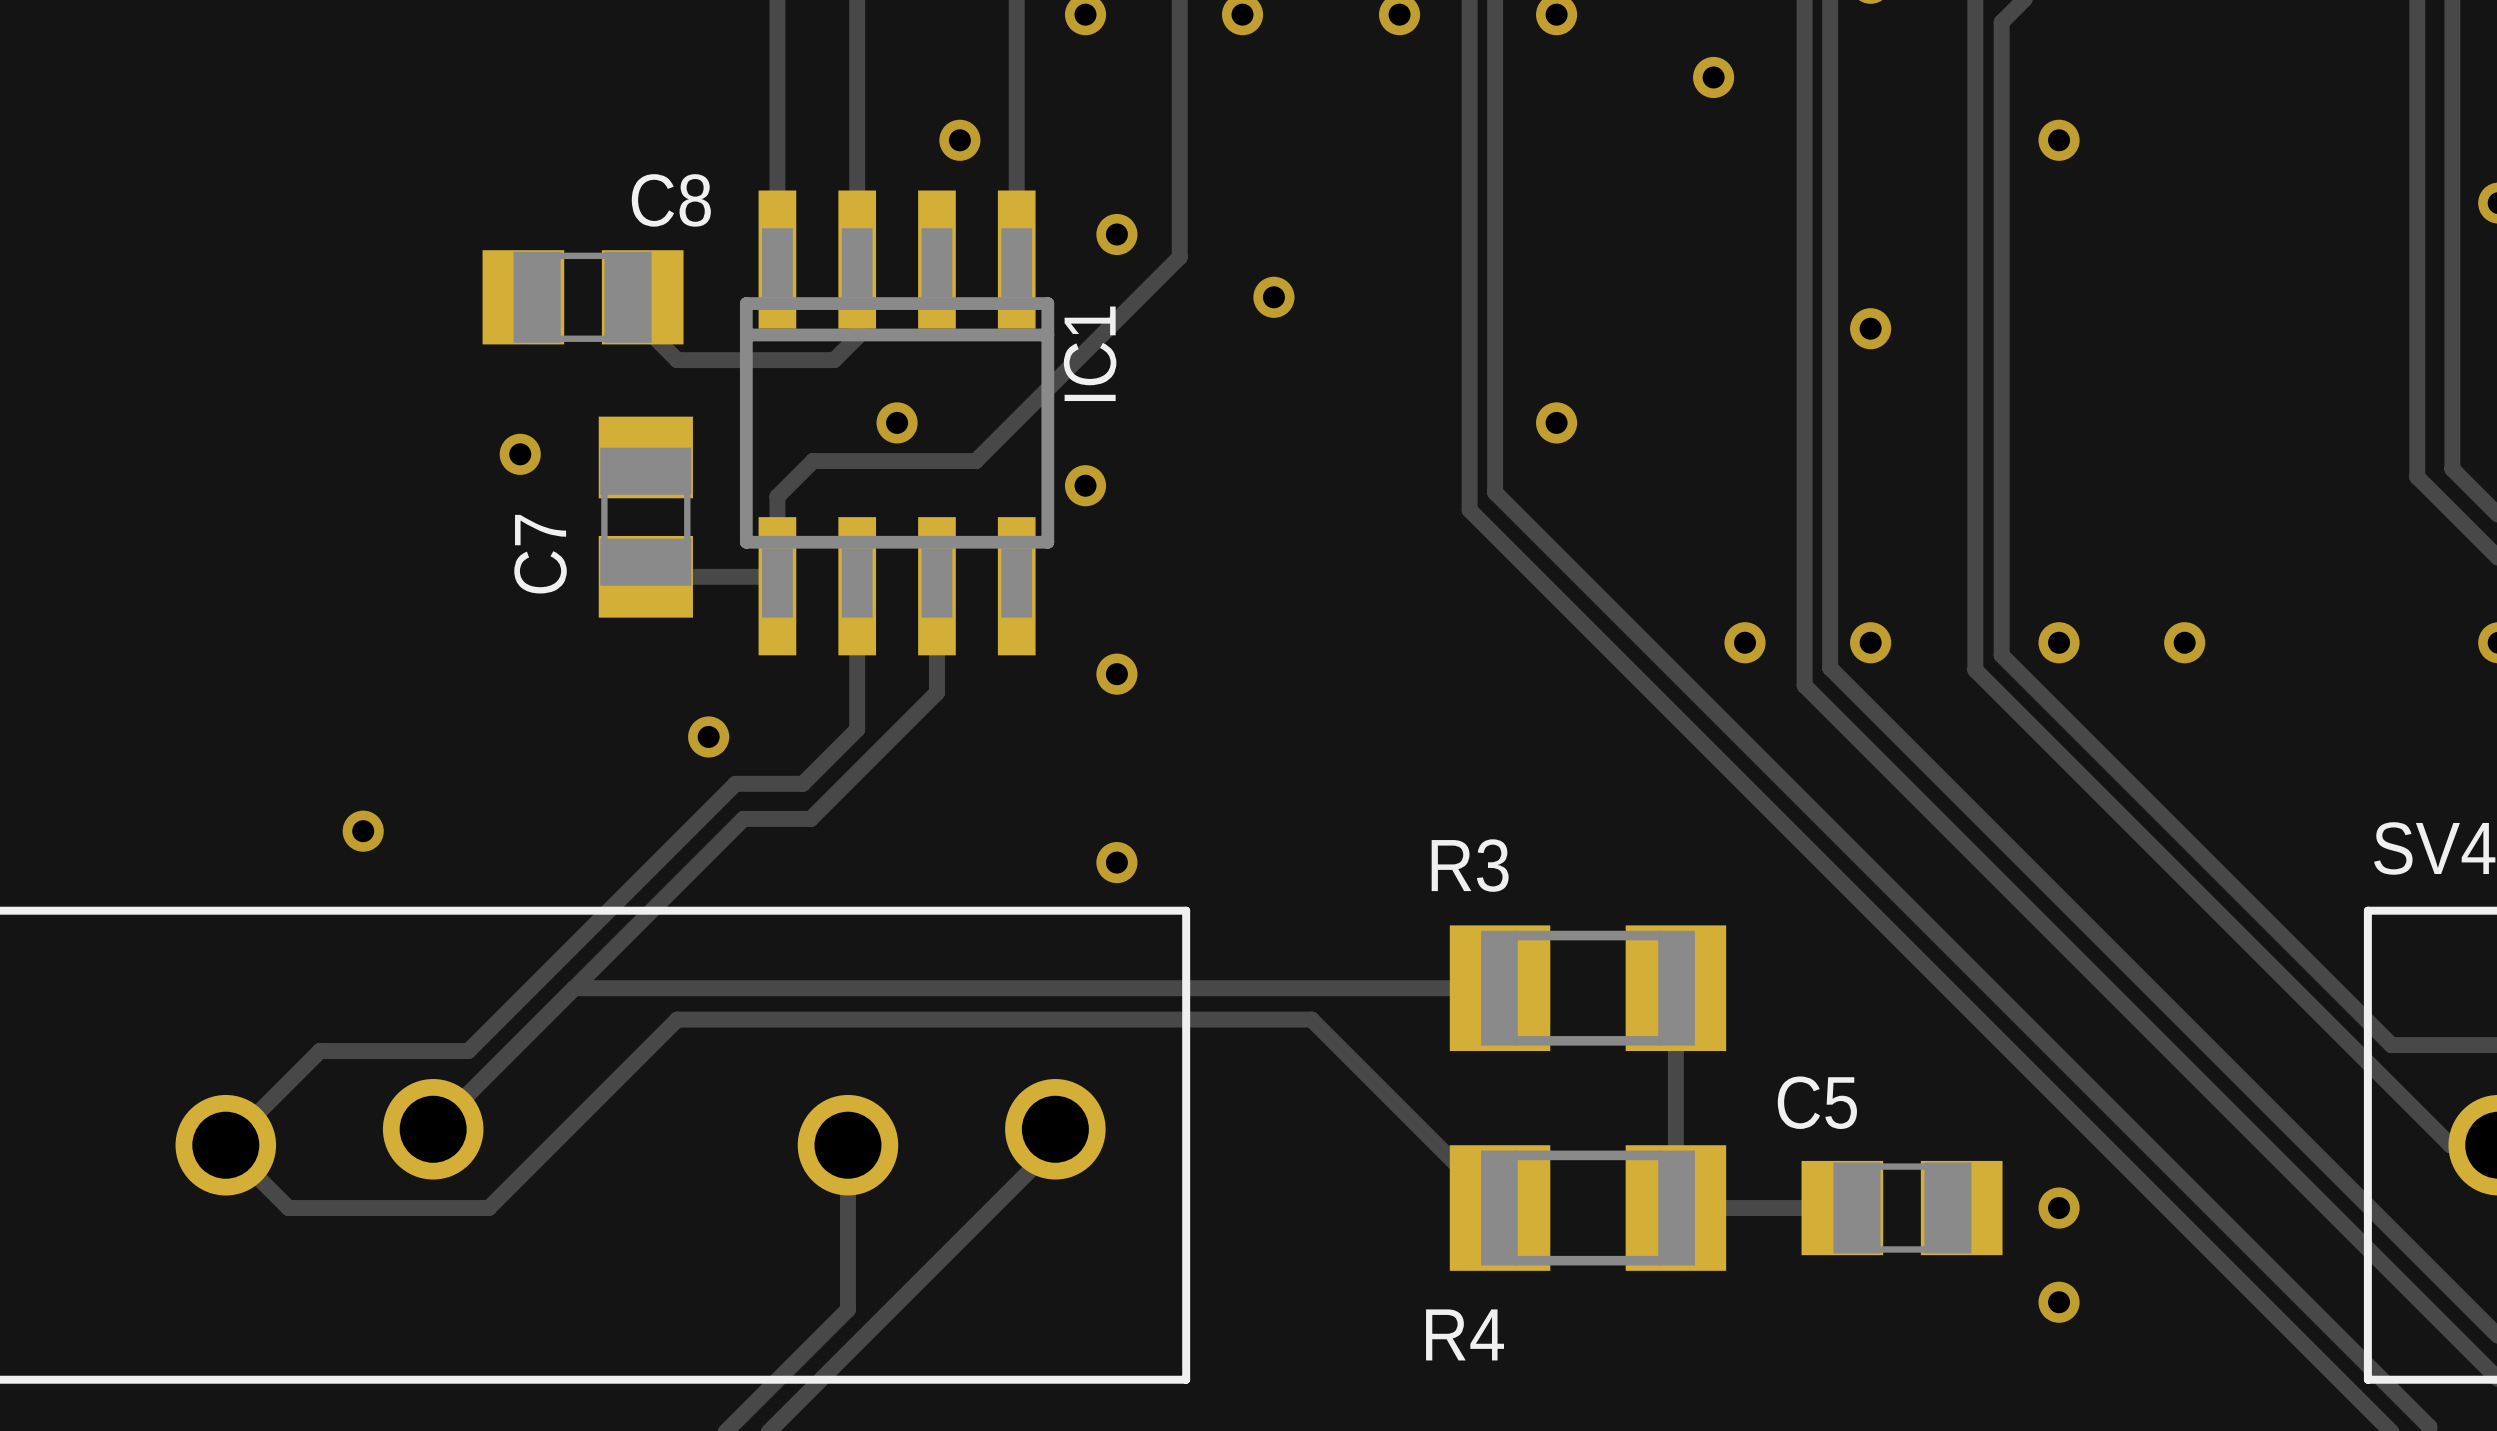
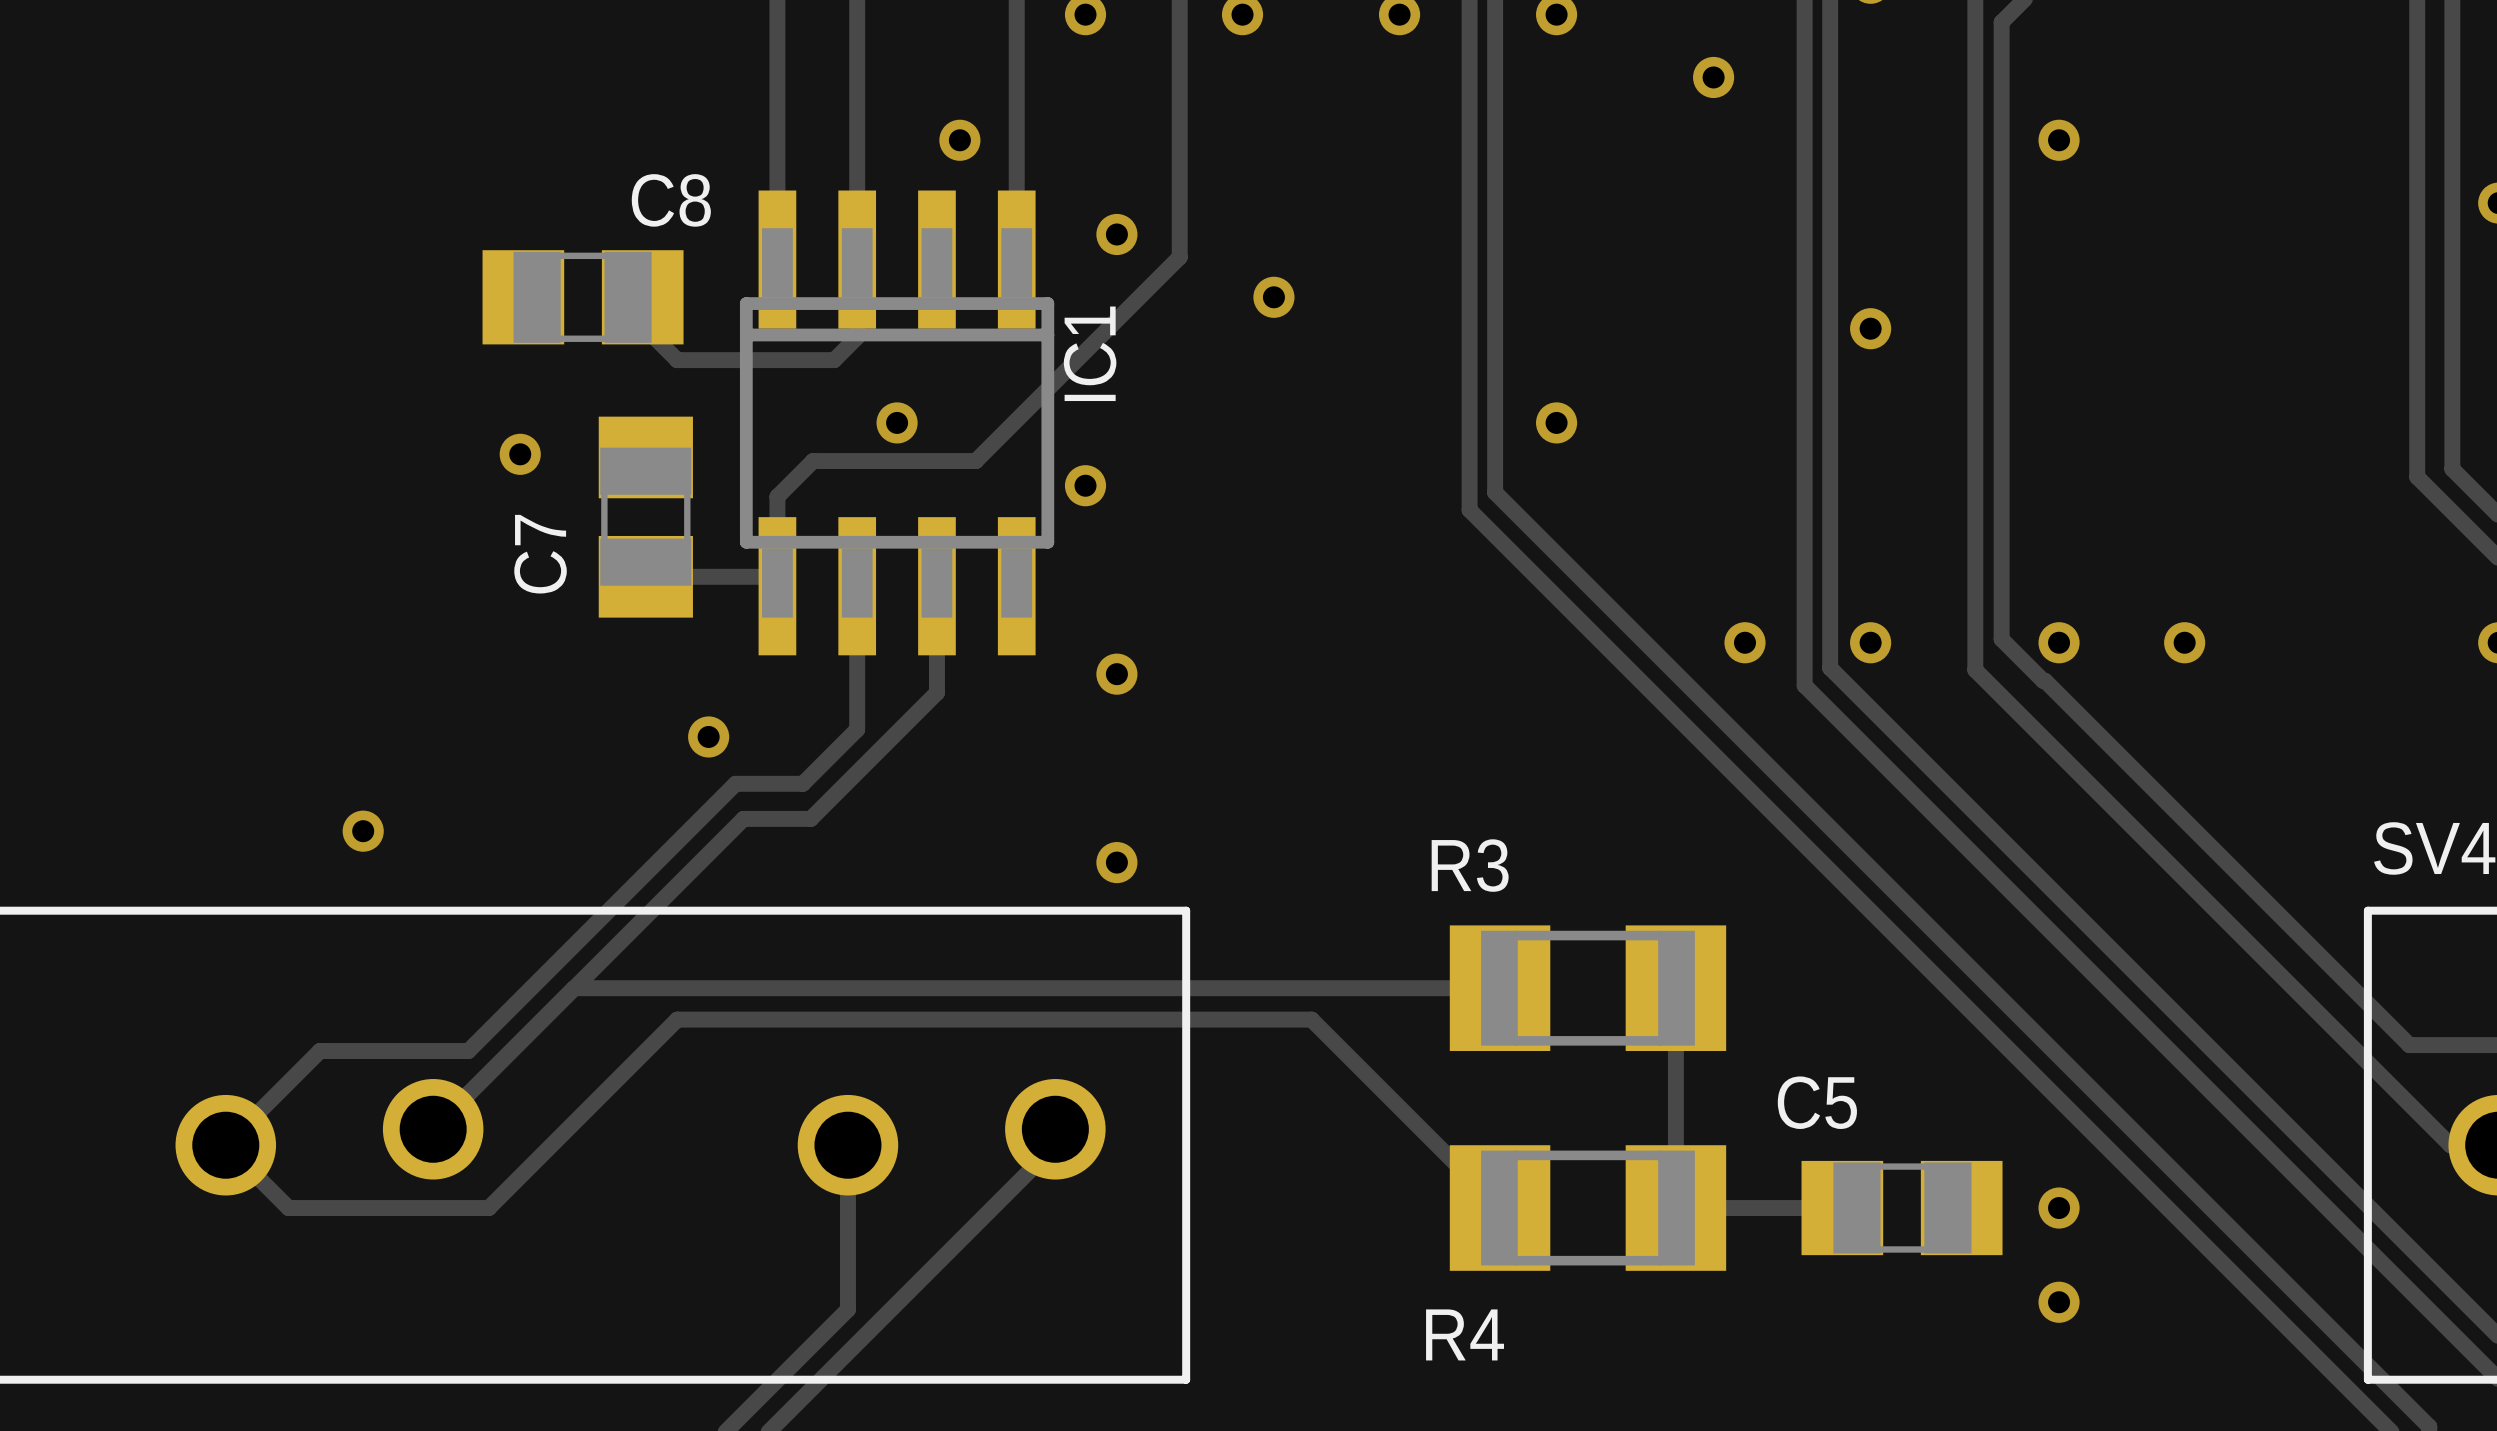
track: (2001, 639) (2001, 655) (2391, 1045) (2409, 1045) -> (2001, 639) (2409, 1045)

